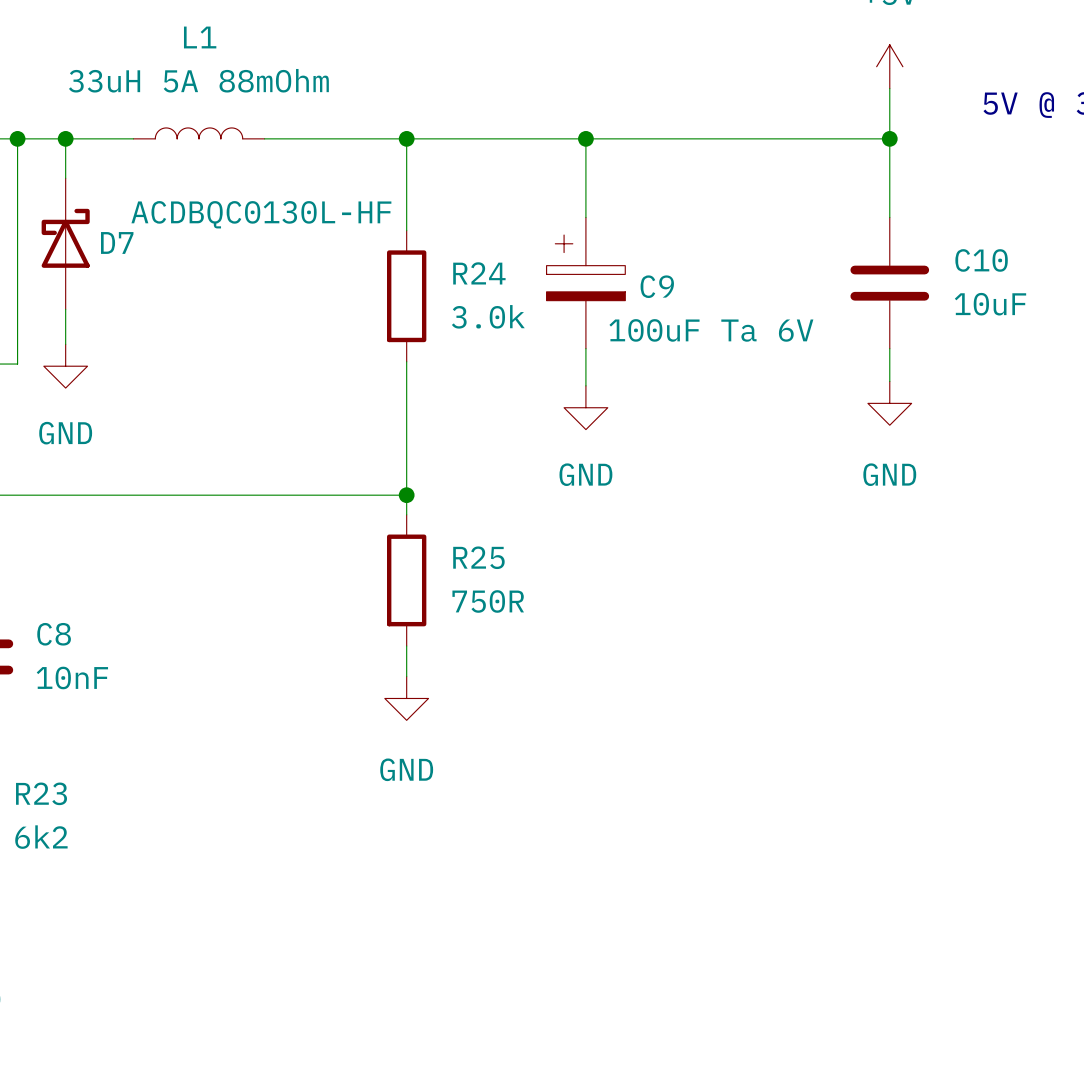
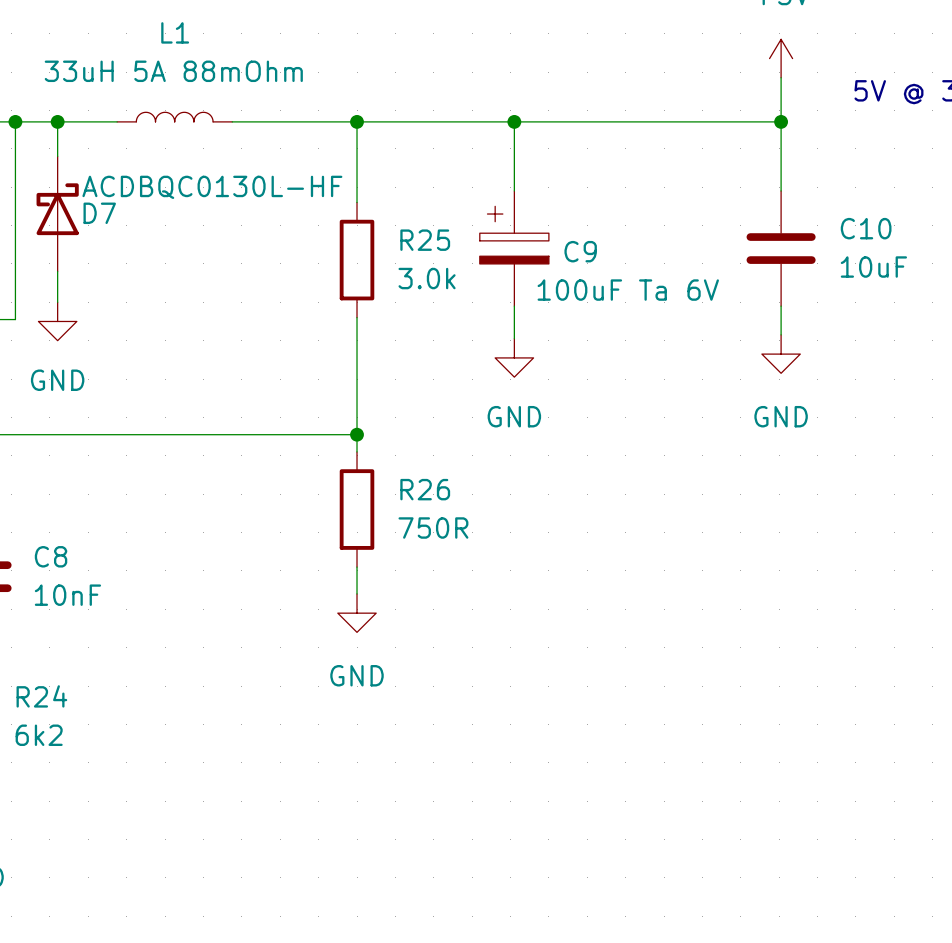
R24 name: R24 (479, 273) -> R25 (425, 240)
R25 name: R25 (478, 557) -> R26 (425, 489)
R23 name: R23 (41, 793) -> R24 (41, 696)

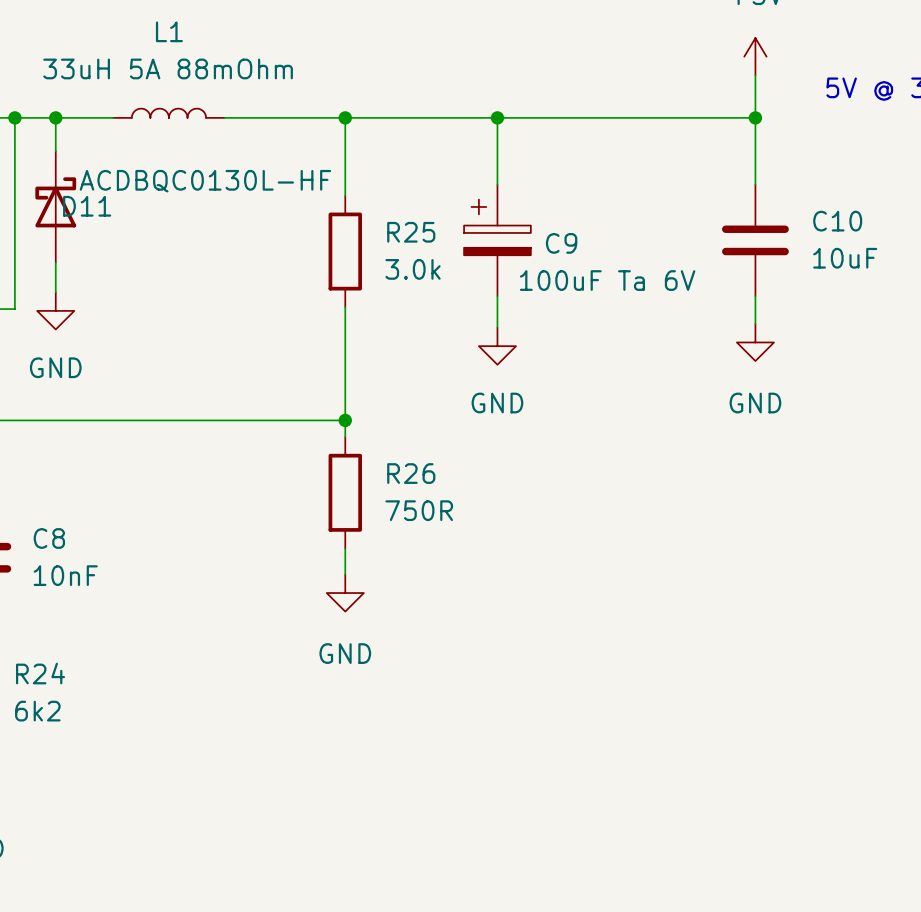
D7 name: D7 (99, 213) -> D11 (87, 206)

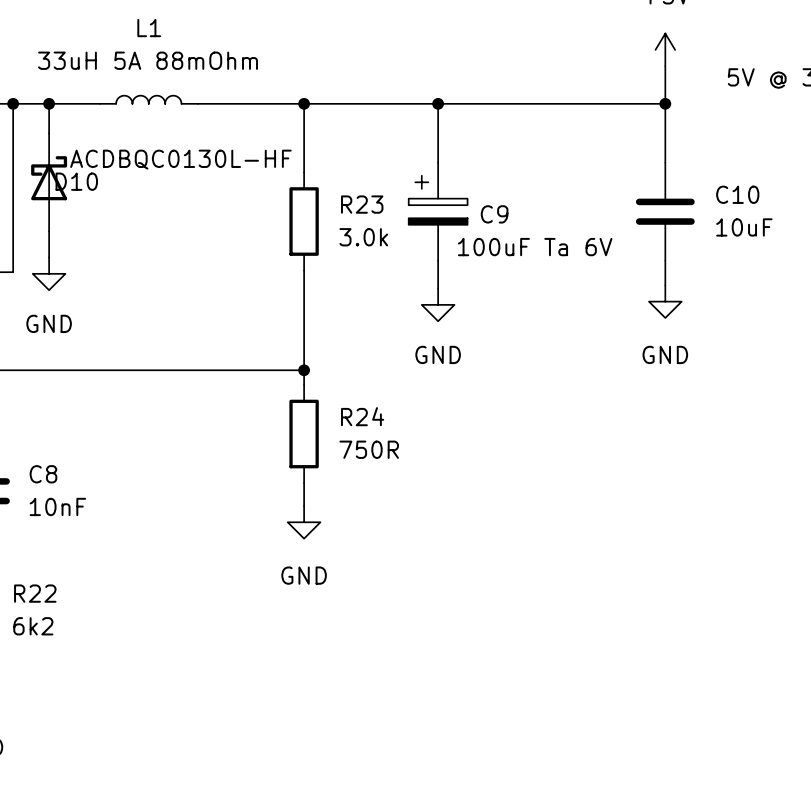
D11 name: D11 (87, 206) -> D10 (76, 181)
R25 name: R25 (411, 232) -> R23 (362, 204)
R26 name: R26 (411, 473) -> R24 (362, 416)
R24 name: R24 (40, 673) -> R22 (35, 593)

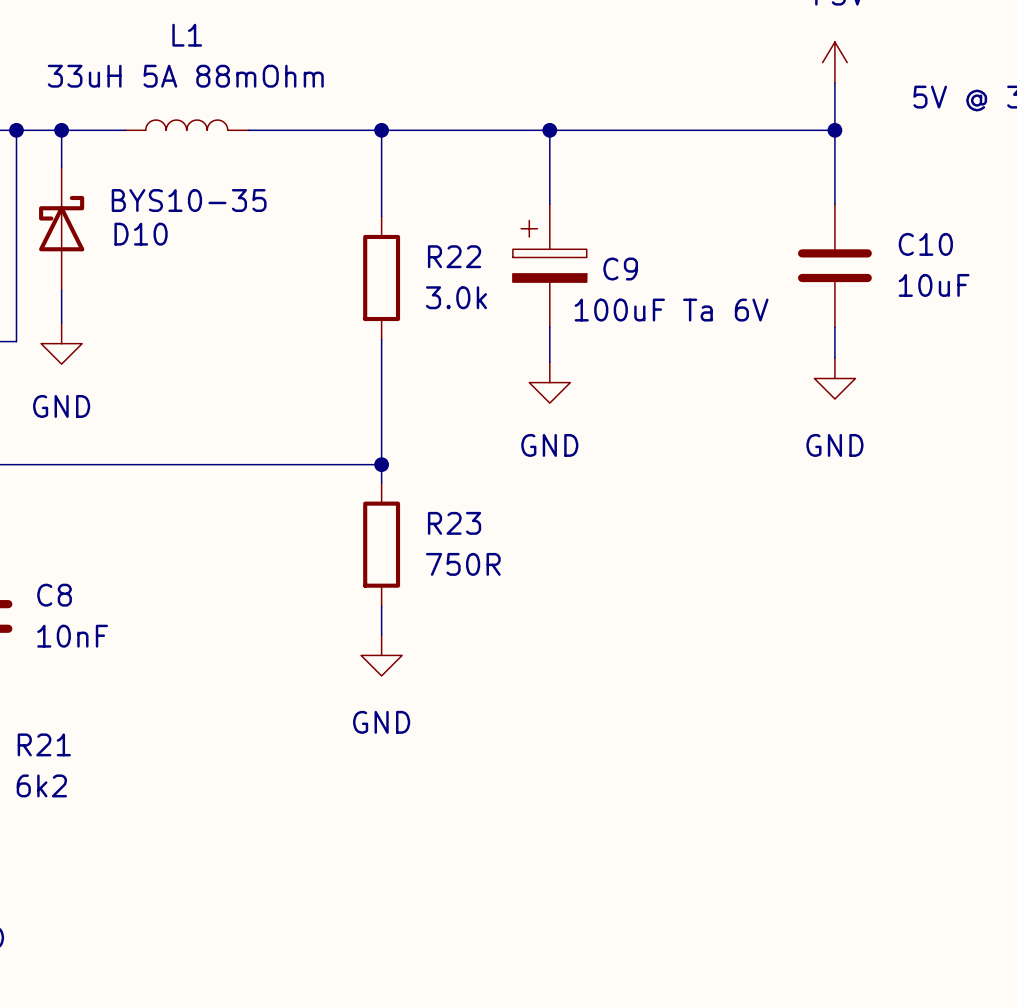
D10 value: ACDBQC0130L-HF (180, 159) -> BYS10-35 (189, 200)
D10 name position: D10 (76, 181) -> D10 (141, 234)
R23 name: R23 (362, 204) -> R22 (454, 256)
R24 name: R24 (362, 416) -> R23 (454, 523)
R22 name: R22 (35, 593) -> R21 (44, 744)

